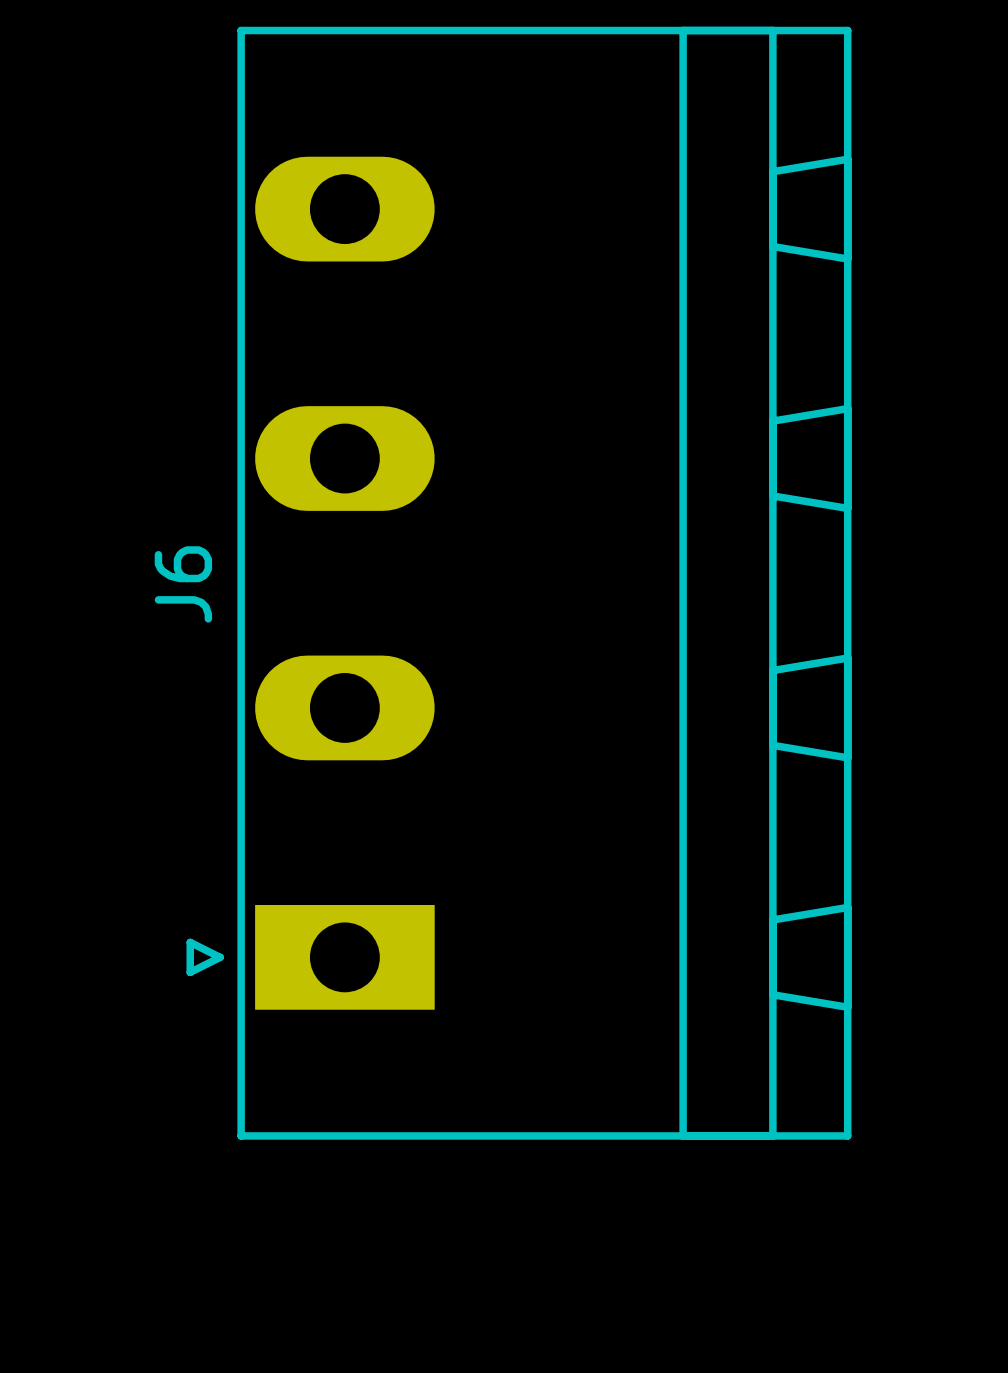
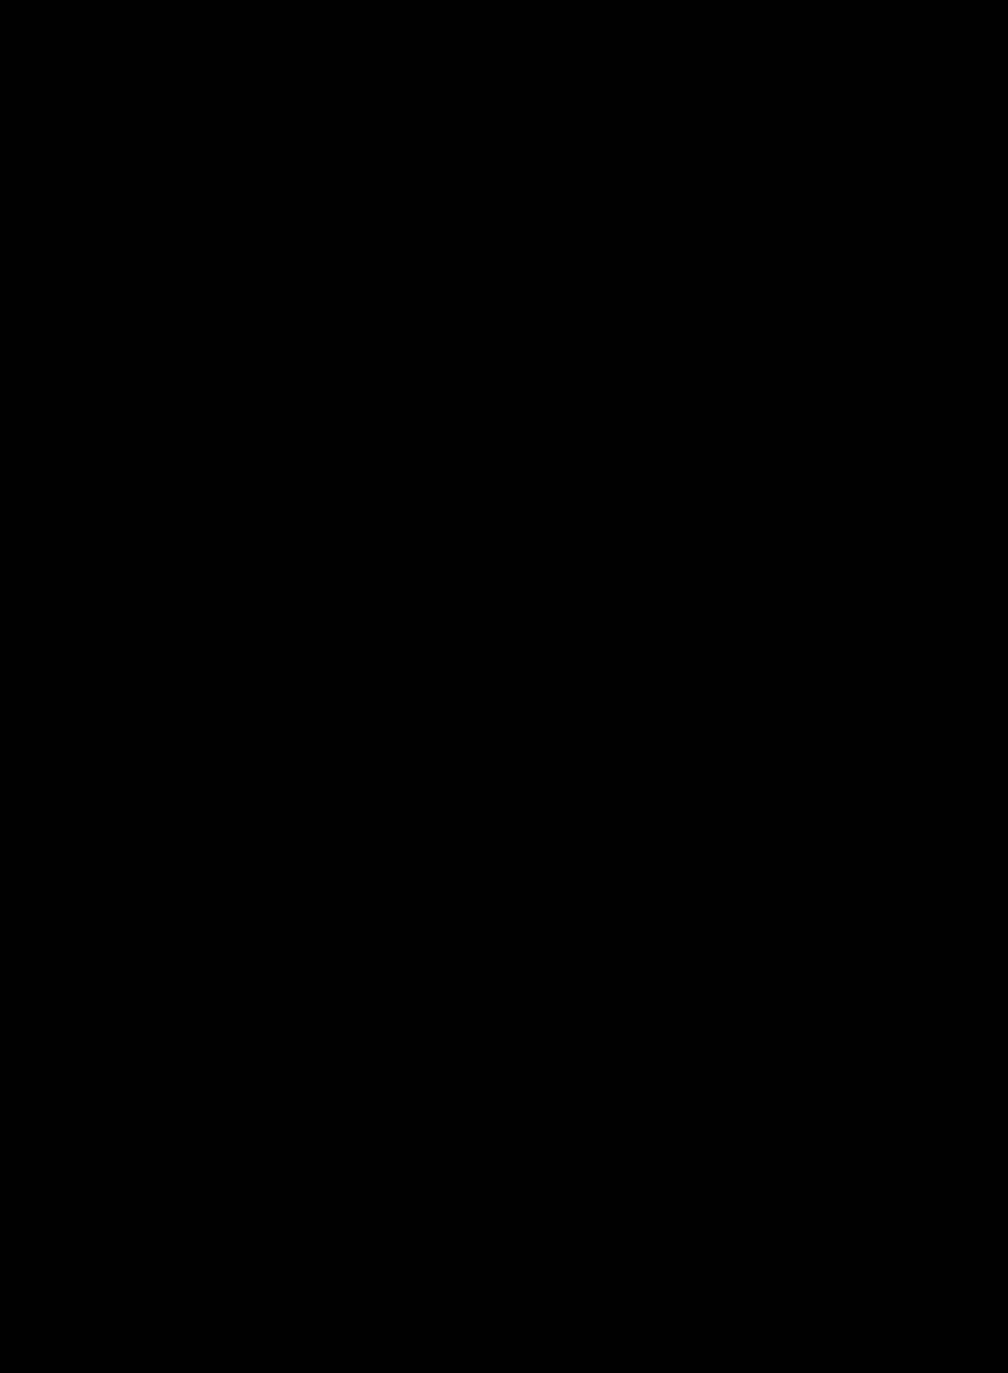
J6: (518, 583) -> none

